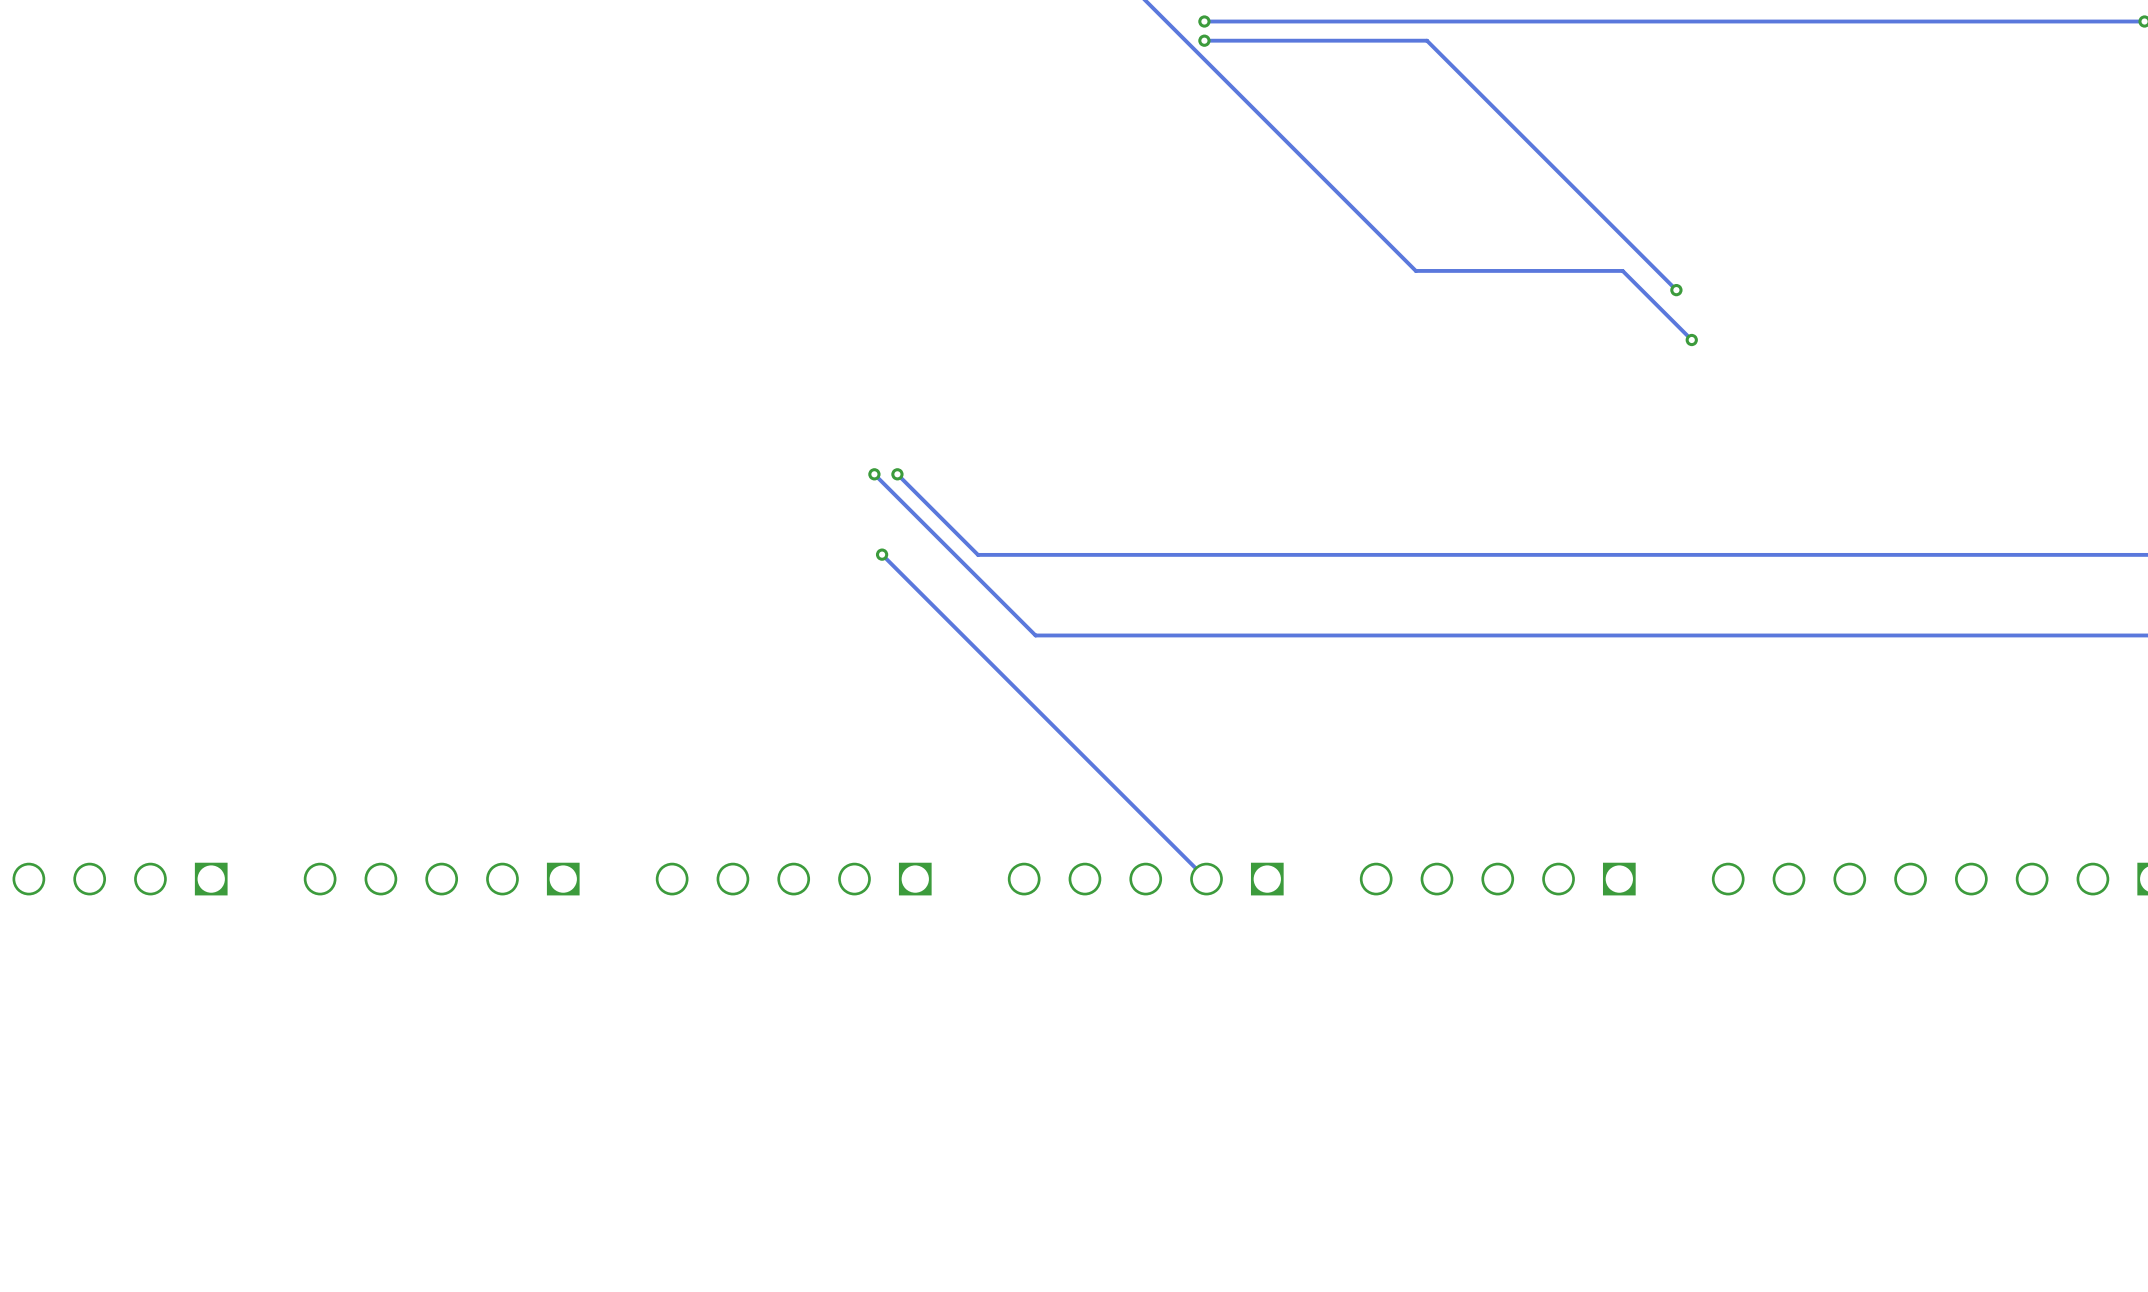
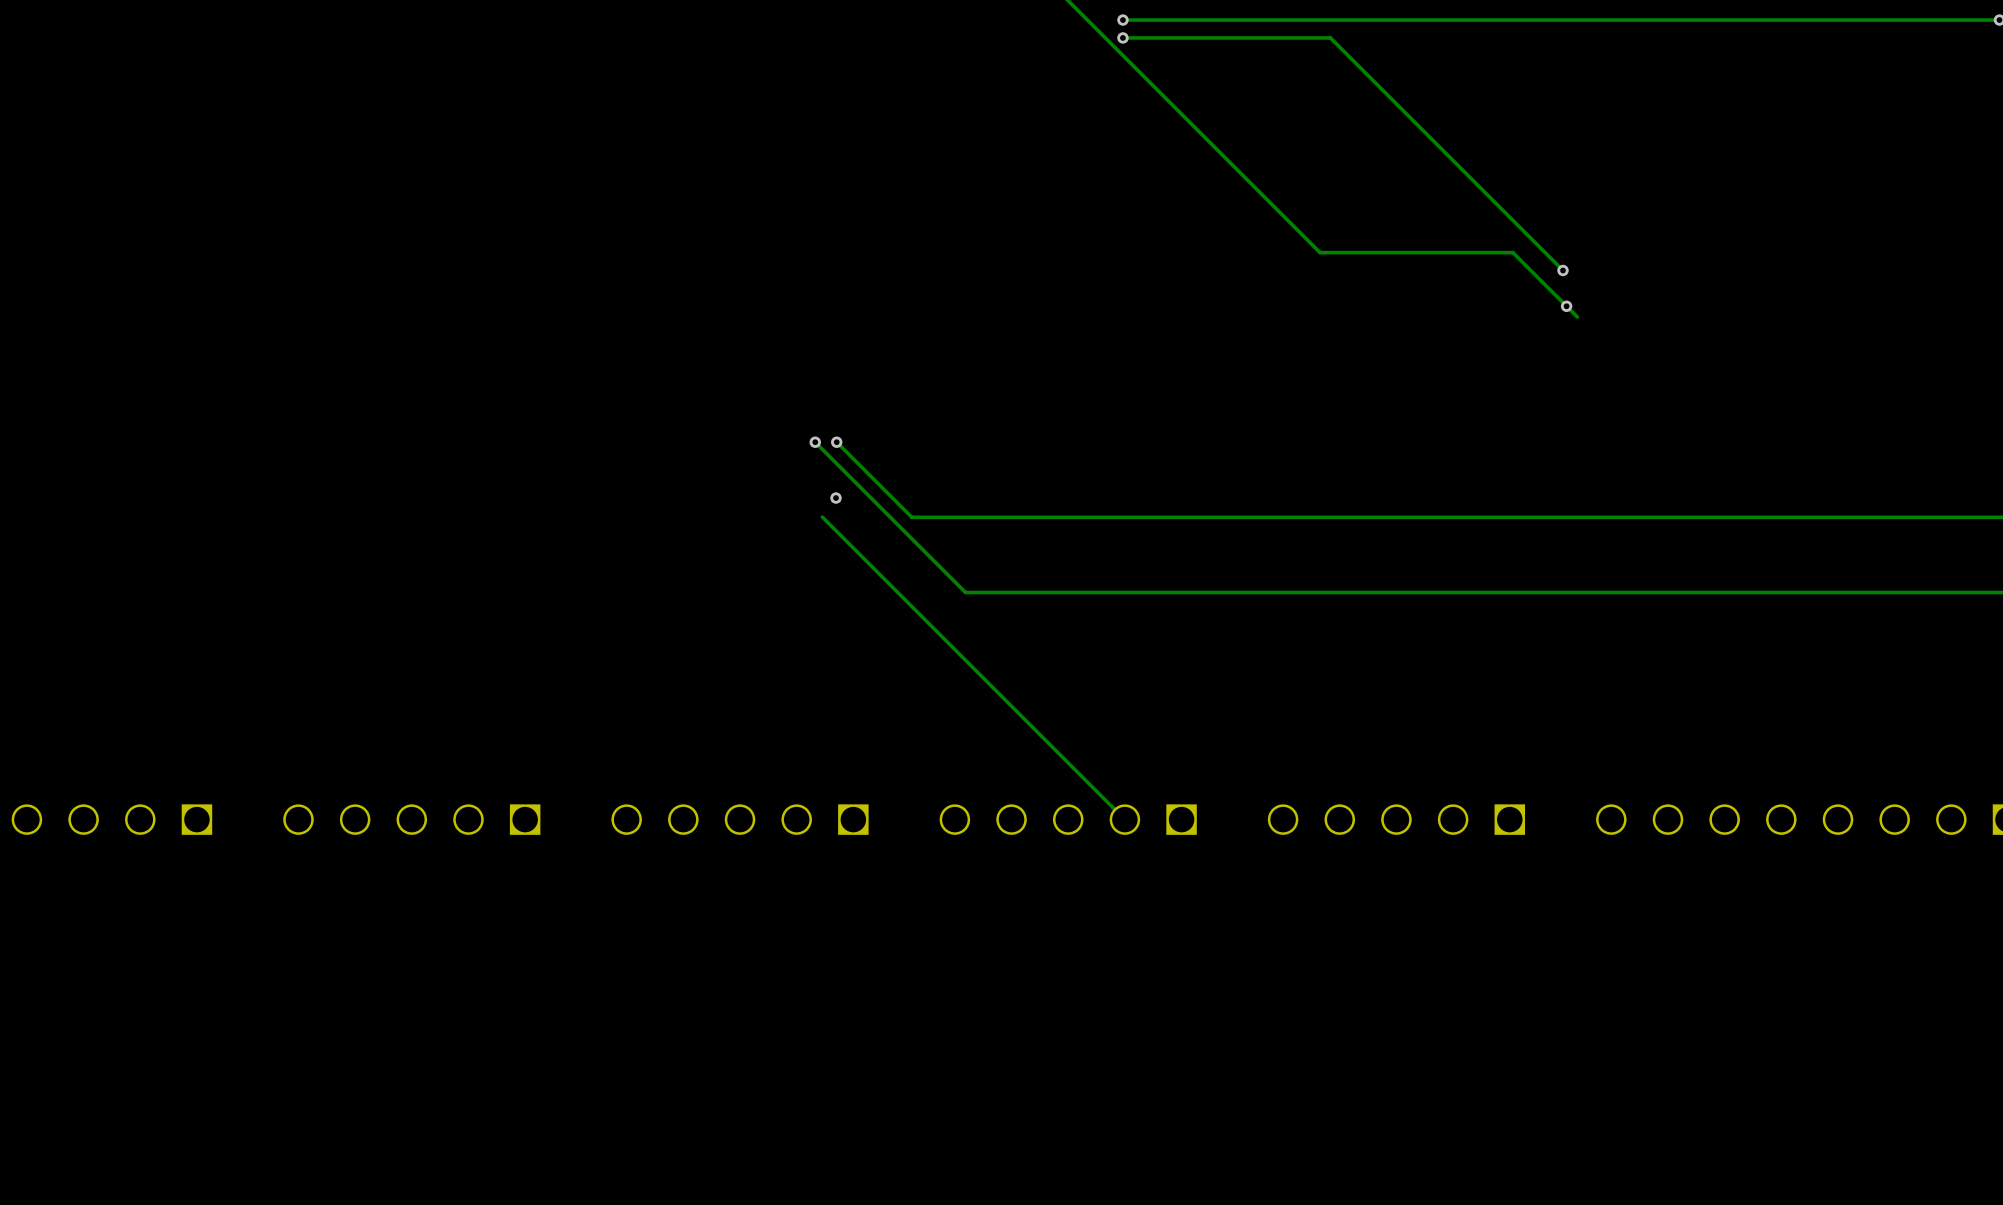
via position: (1691, 340) -> (1566, 306)
via position: (882, 554) -> (836, 498)

